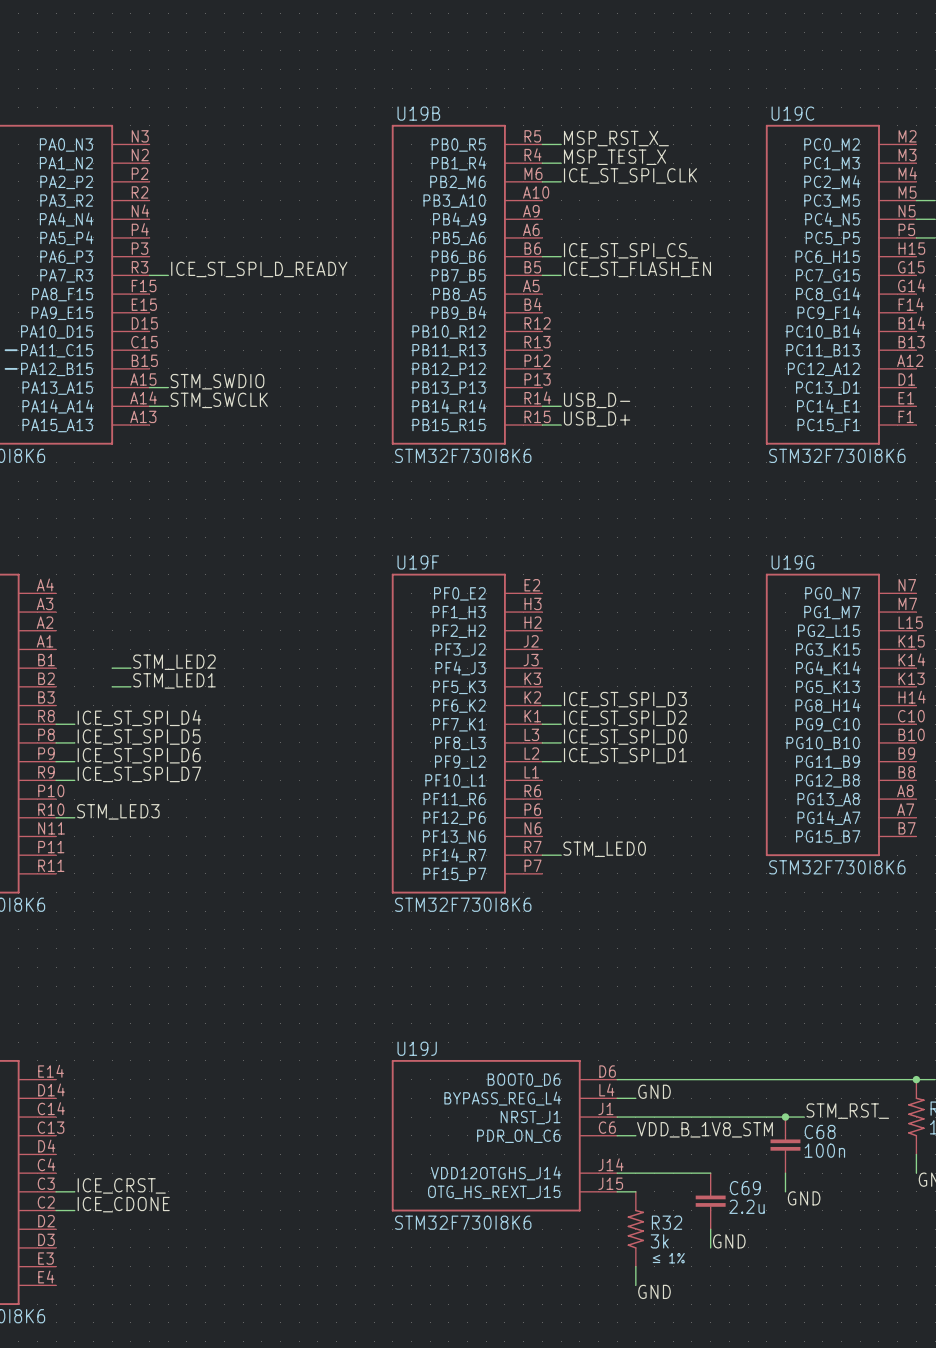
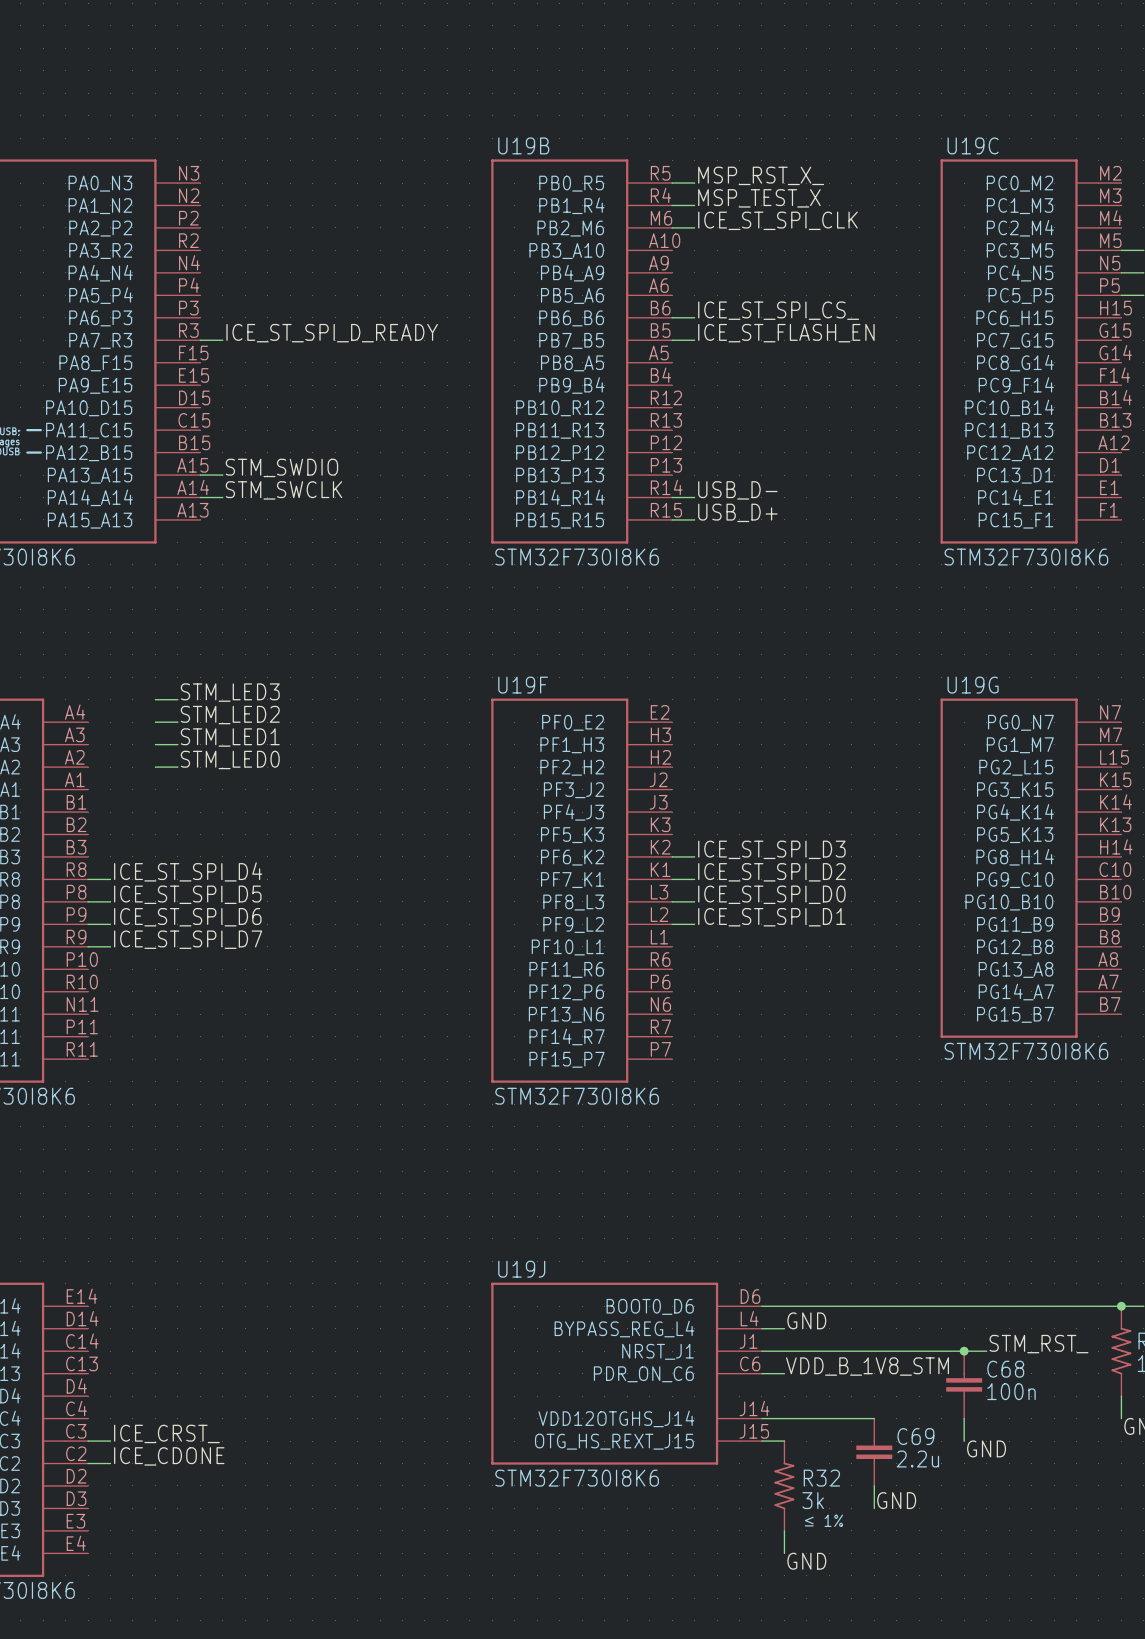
label: none -> STM_LED3 (230, 692)
wire: none -> (155, 699) (177, 699)
wire: none -> (155, 722) (177, 722)
label: none -> STM_LED0 (230, 759)
label position: STM_LED2 (174, 662) -> STM_LED2 (230, 715)
wire: (112, 668) (130, 668) -> (155, 767) (177, 767)
label position: STM_LED1 (174, 680) -> STM_LED1 (230, 737)
wire: (112, 686) (130, 686) -> (155, 744) (177, 744)
label: STM_LED3 (118, 811) -> none
wire: (56, 817) (74, 817) -> none
label: STM_LED0 (604, 849) -> none
wire: (542, 855) (561, 855) -> none

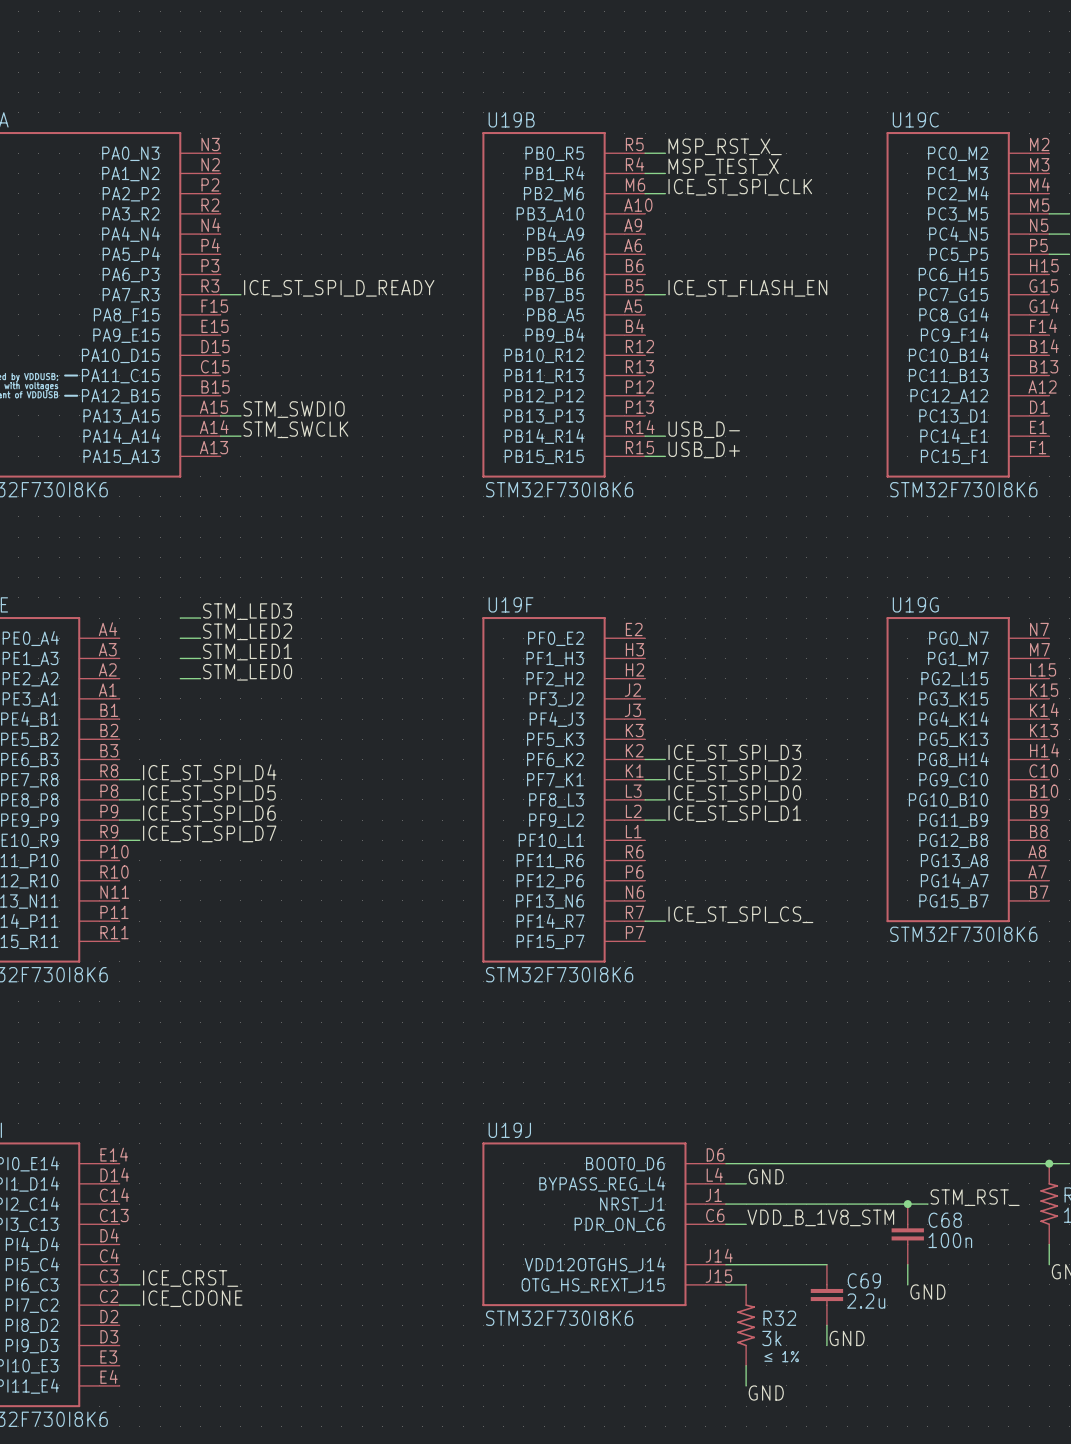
label: ICE_ST_SPI_CS_ (778, 310) -> none
wire: (672, 317) (694, 317) -> none
label: none -> ICE_ST_SPI_CS_ (740, 914)
wire: none -> (645, 921) (665, 921)

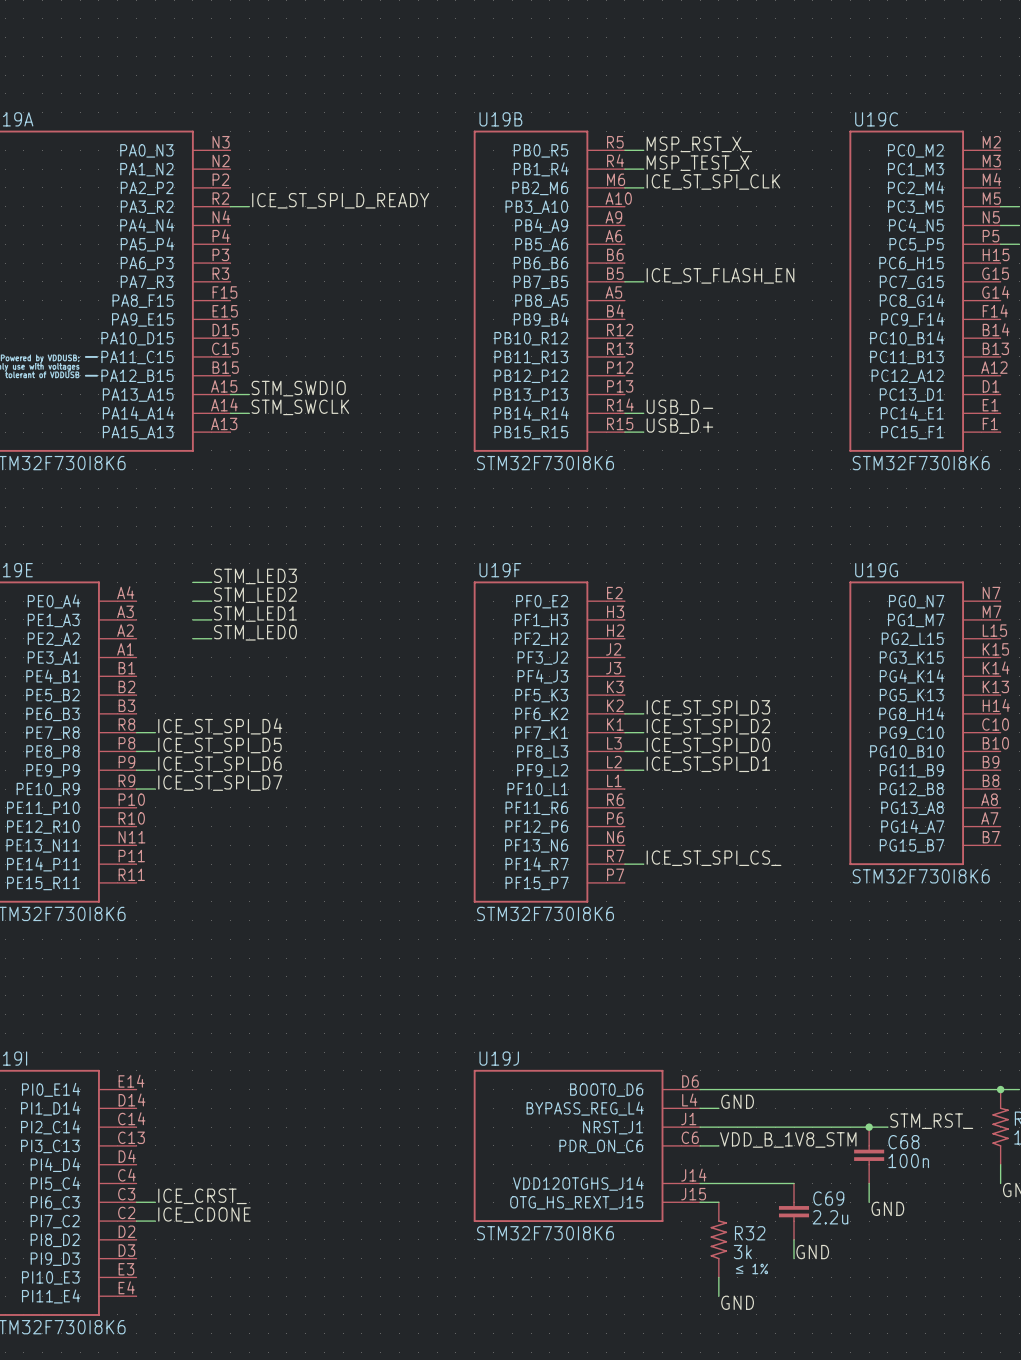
label position: ICE_ST_SPI_D_READY (339, 288) -> ICE_ST_SPI_D_READY (340, 200)
wire: (220, 294) (240, 294) -> (230, 206) (249, 206)

